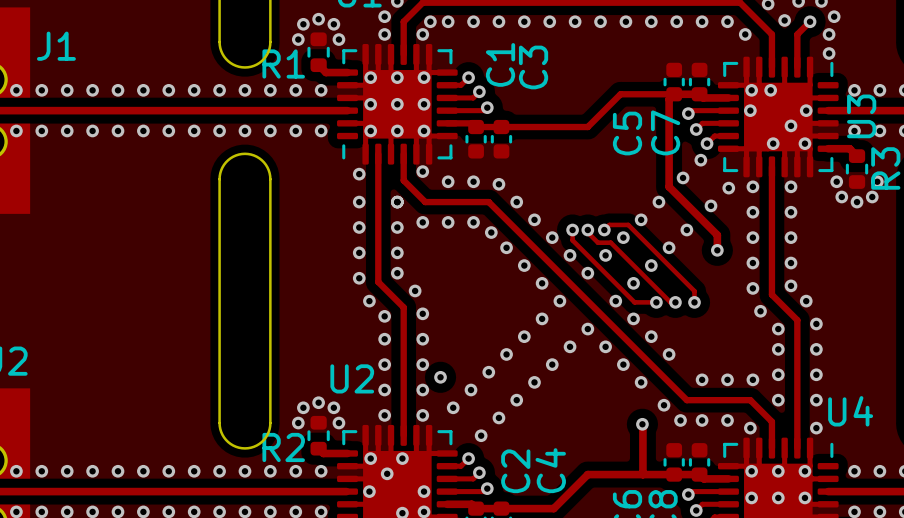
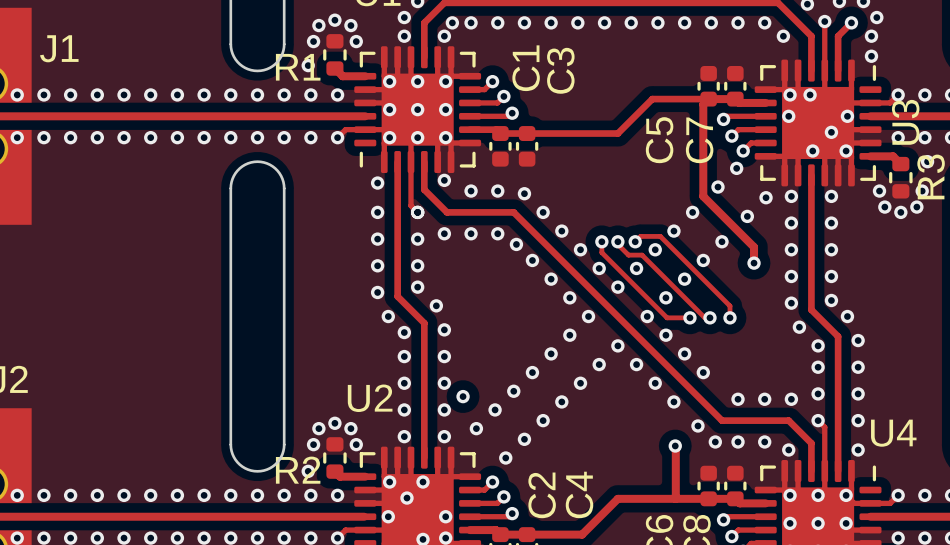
track: none -> (824, 21) (824, 70)
via: none -> (308, 65)
track: none -> (898, 94) (890, 102) (870, 102)
track: none -> (365, 129) (345, 129) (337, 137)
via: none -> (927, 161)
track: none -> (410, 162) (410, 205) (417, 212)
track: none -> (818, 420) (824, 427) (824, 471)
via: none -> (308, 471)
track: none -> (898, 495) (890, 503) (870, 503)
track: none -> (365, 530) (345, 530) (337, 538)

